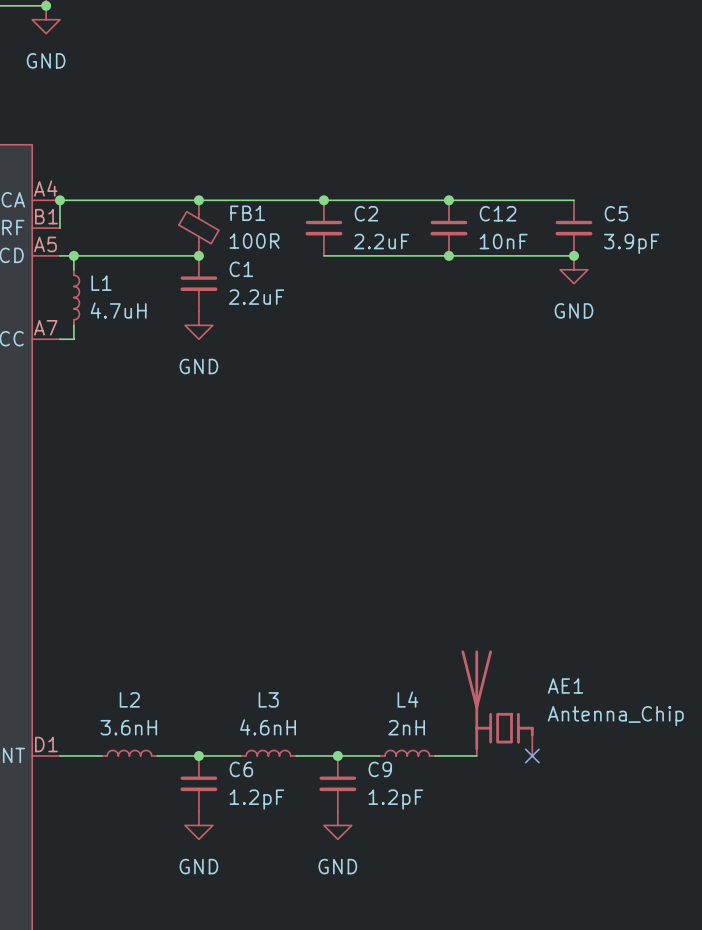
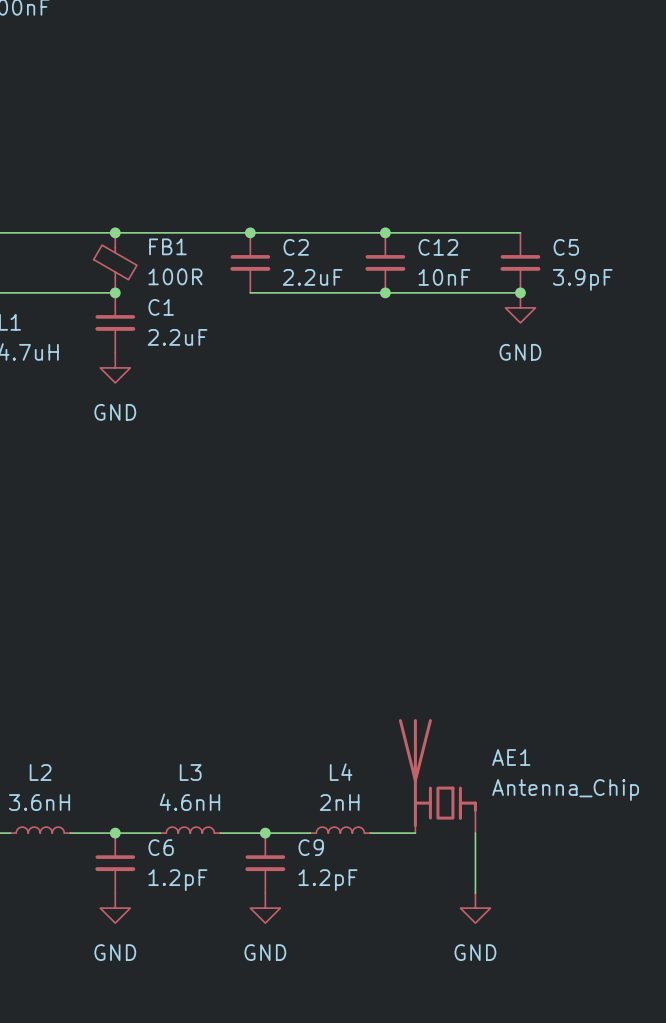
wire: none -> (475, 833) (475, 893)
no-connect mark: (532, 755) -> none
power symbol: none -> GND (475, 908)

